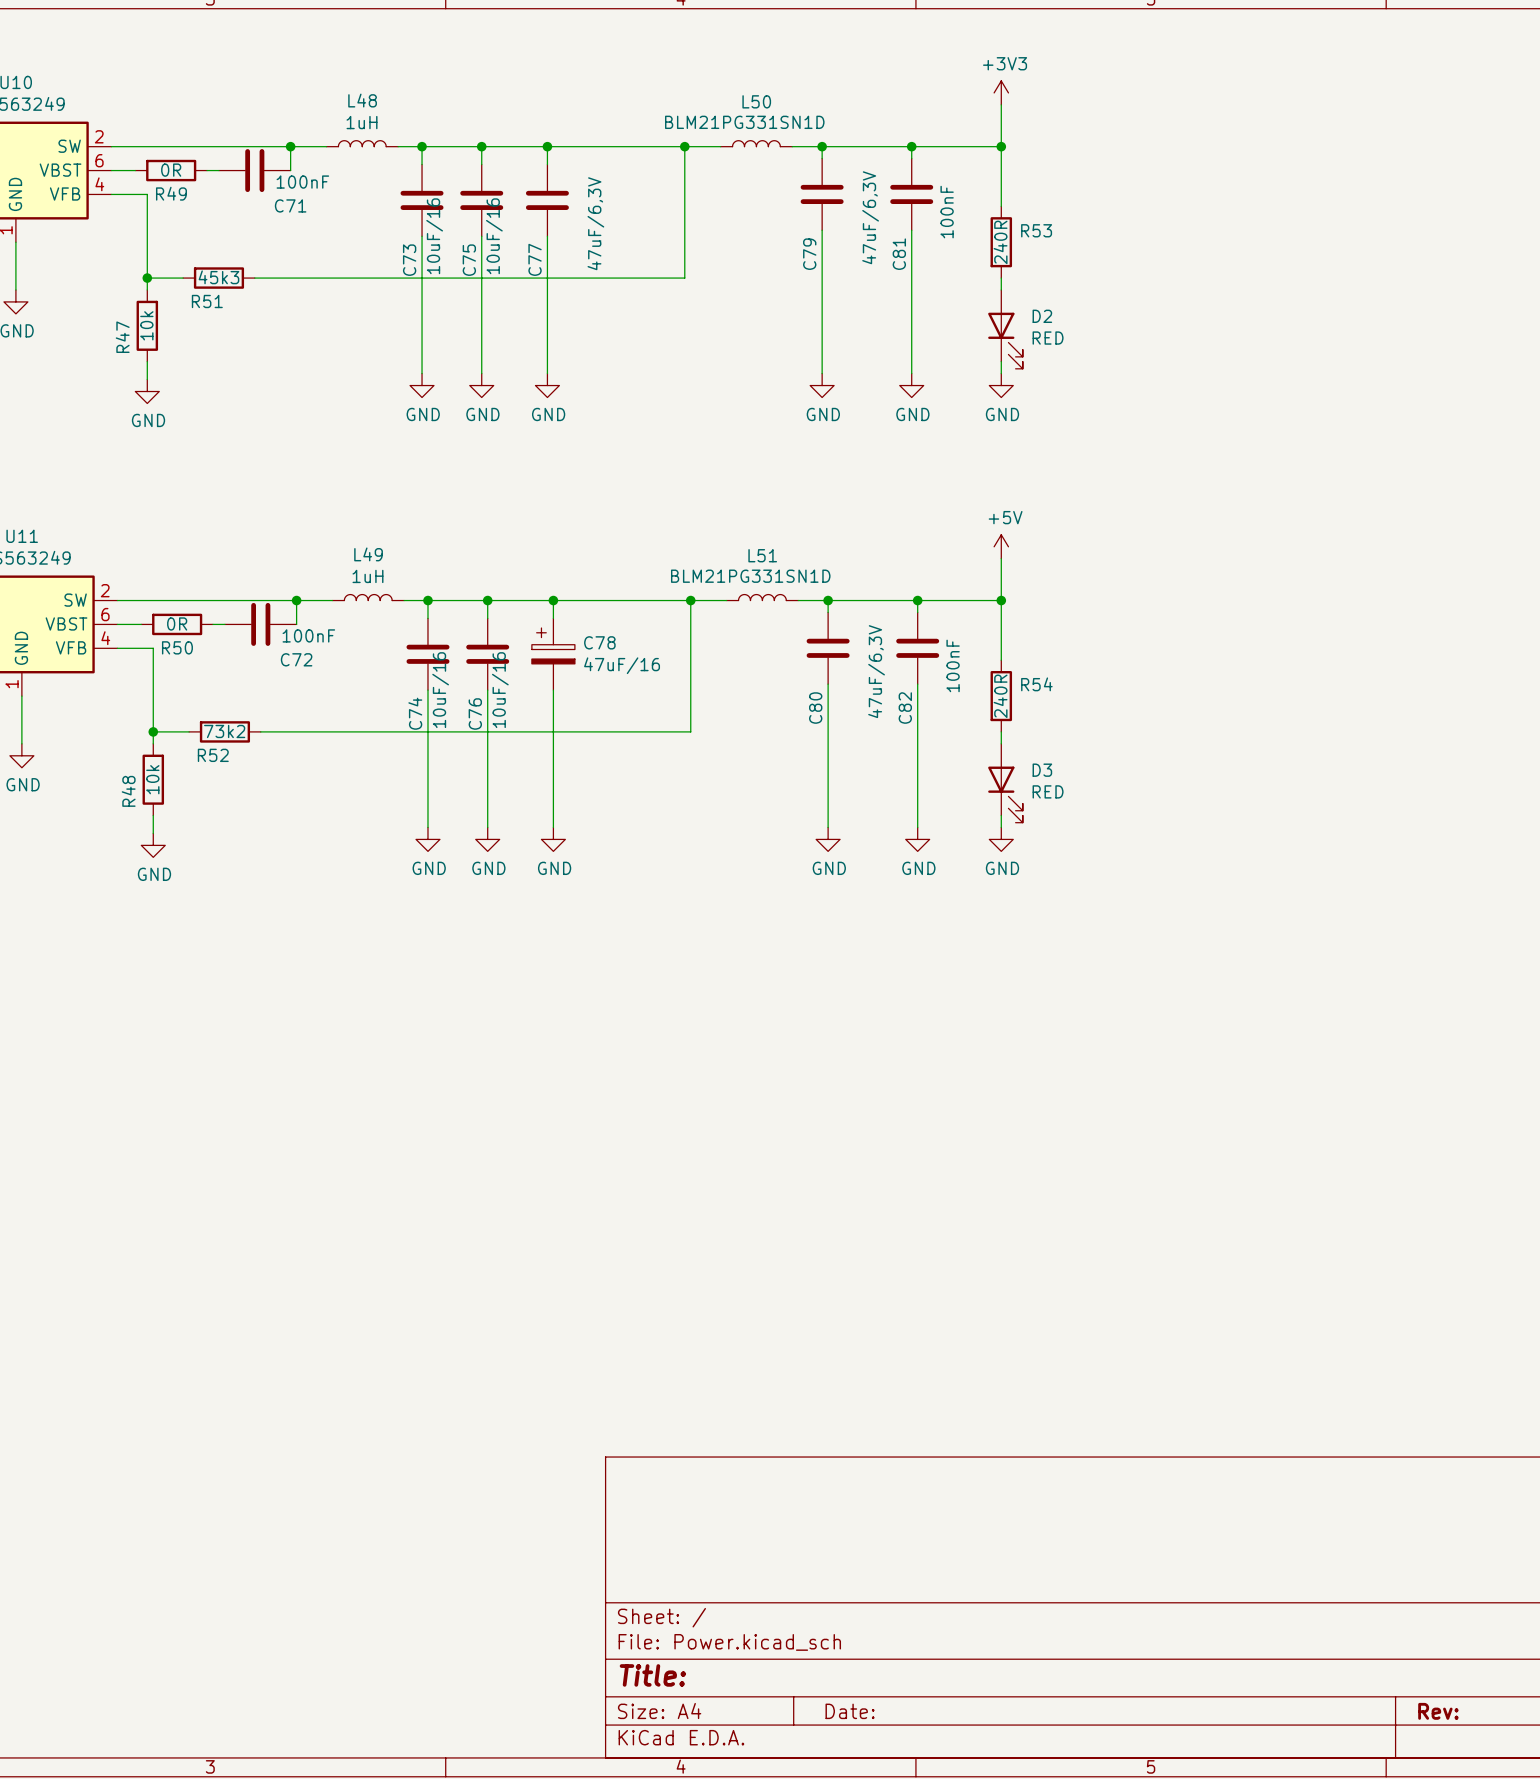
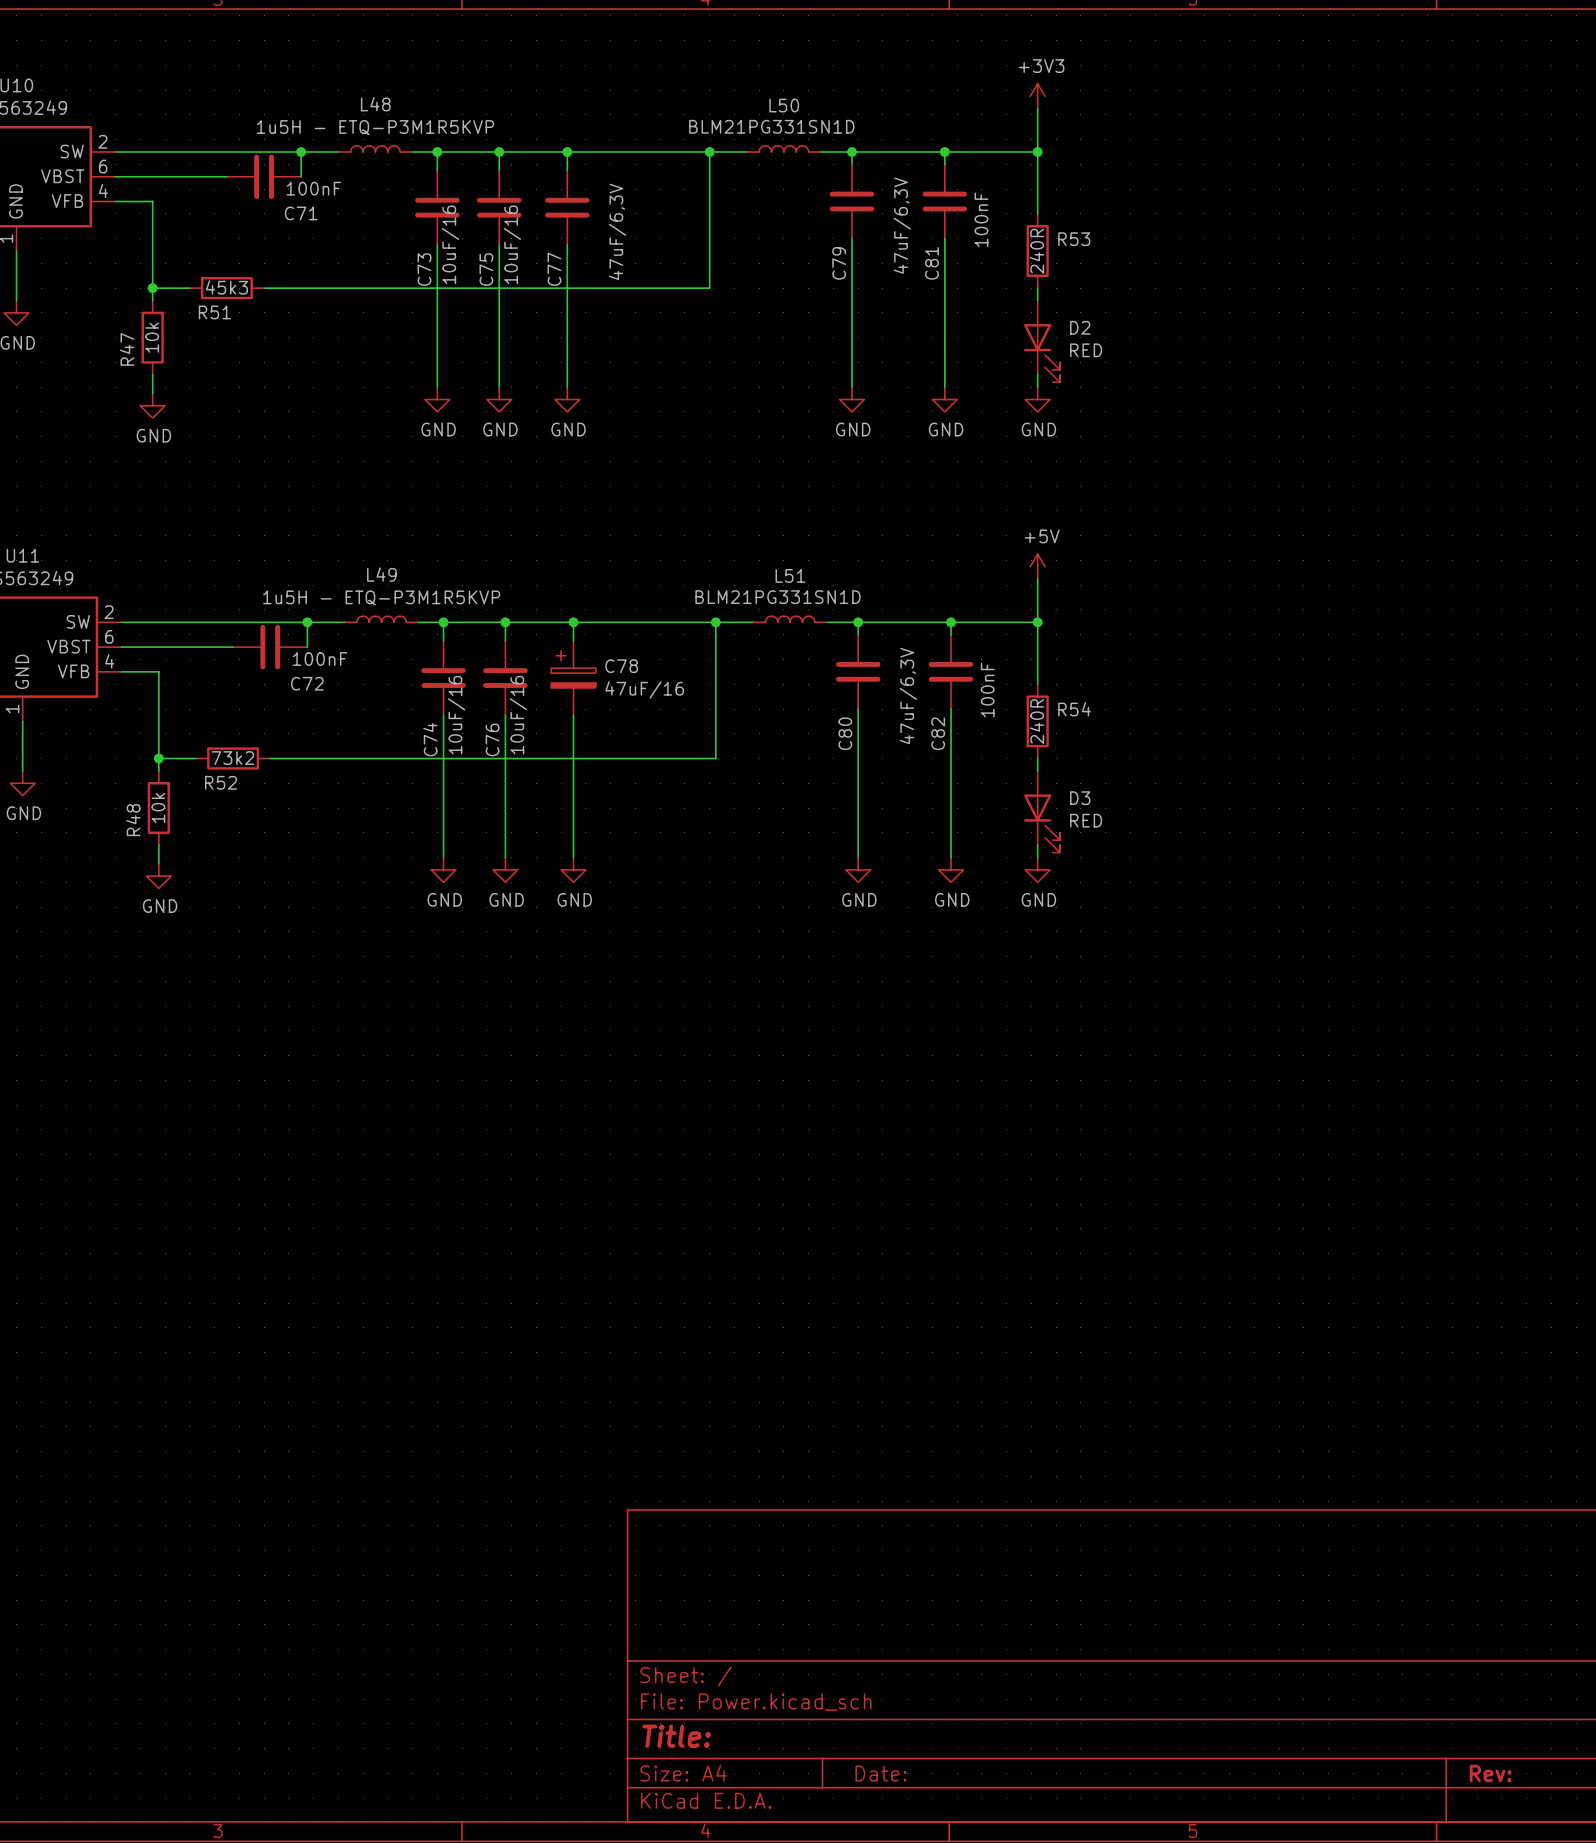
L48 value: 1uH (362, 122) -> 1u5H - ETQ-P3M1R5KVP (375, 127)
wire: none -> (140, 176) (214, 176)
R49: 0R (171, 170) -> none
L49 value: 1uH (367, 576) -> 1u5H - ETQ-P3M1R5KVP (381, 597)
wire: none -> (146, 647) (220, 647)
R50: 0R (177, 624) -> none

